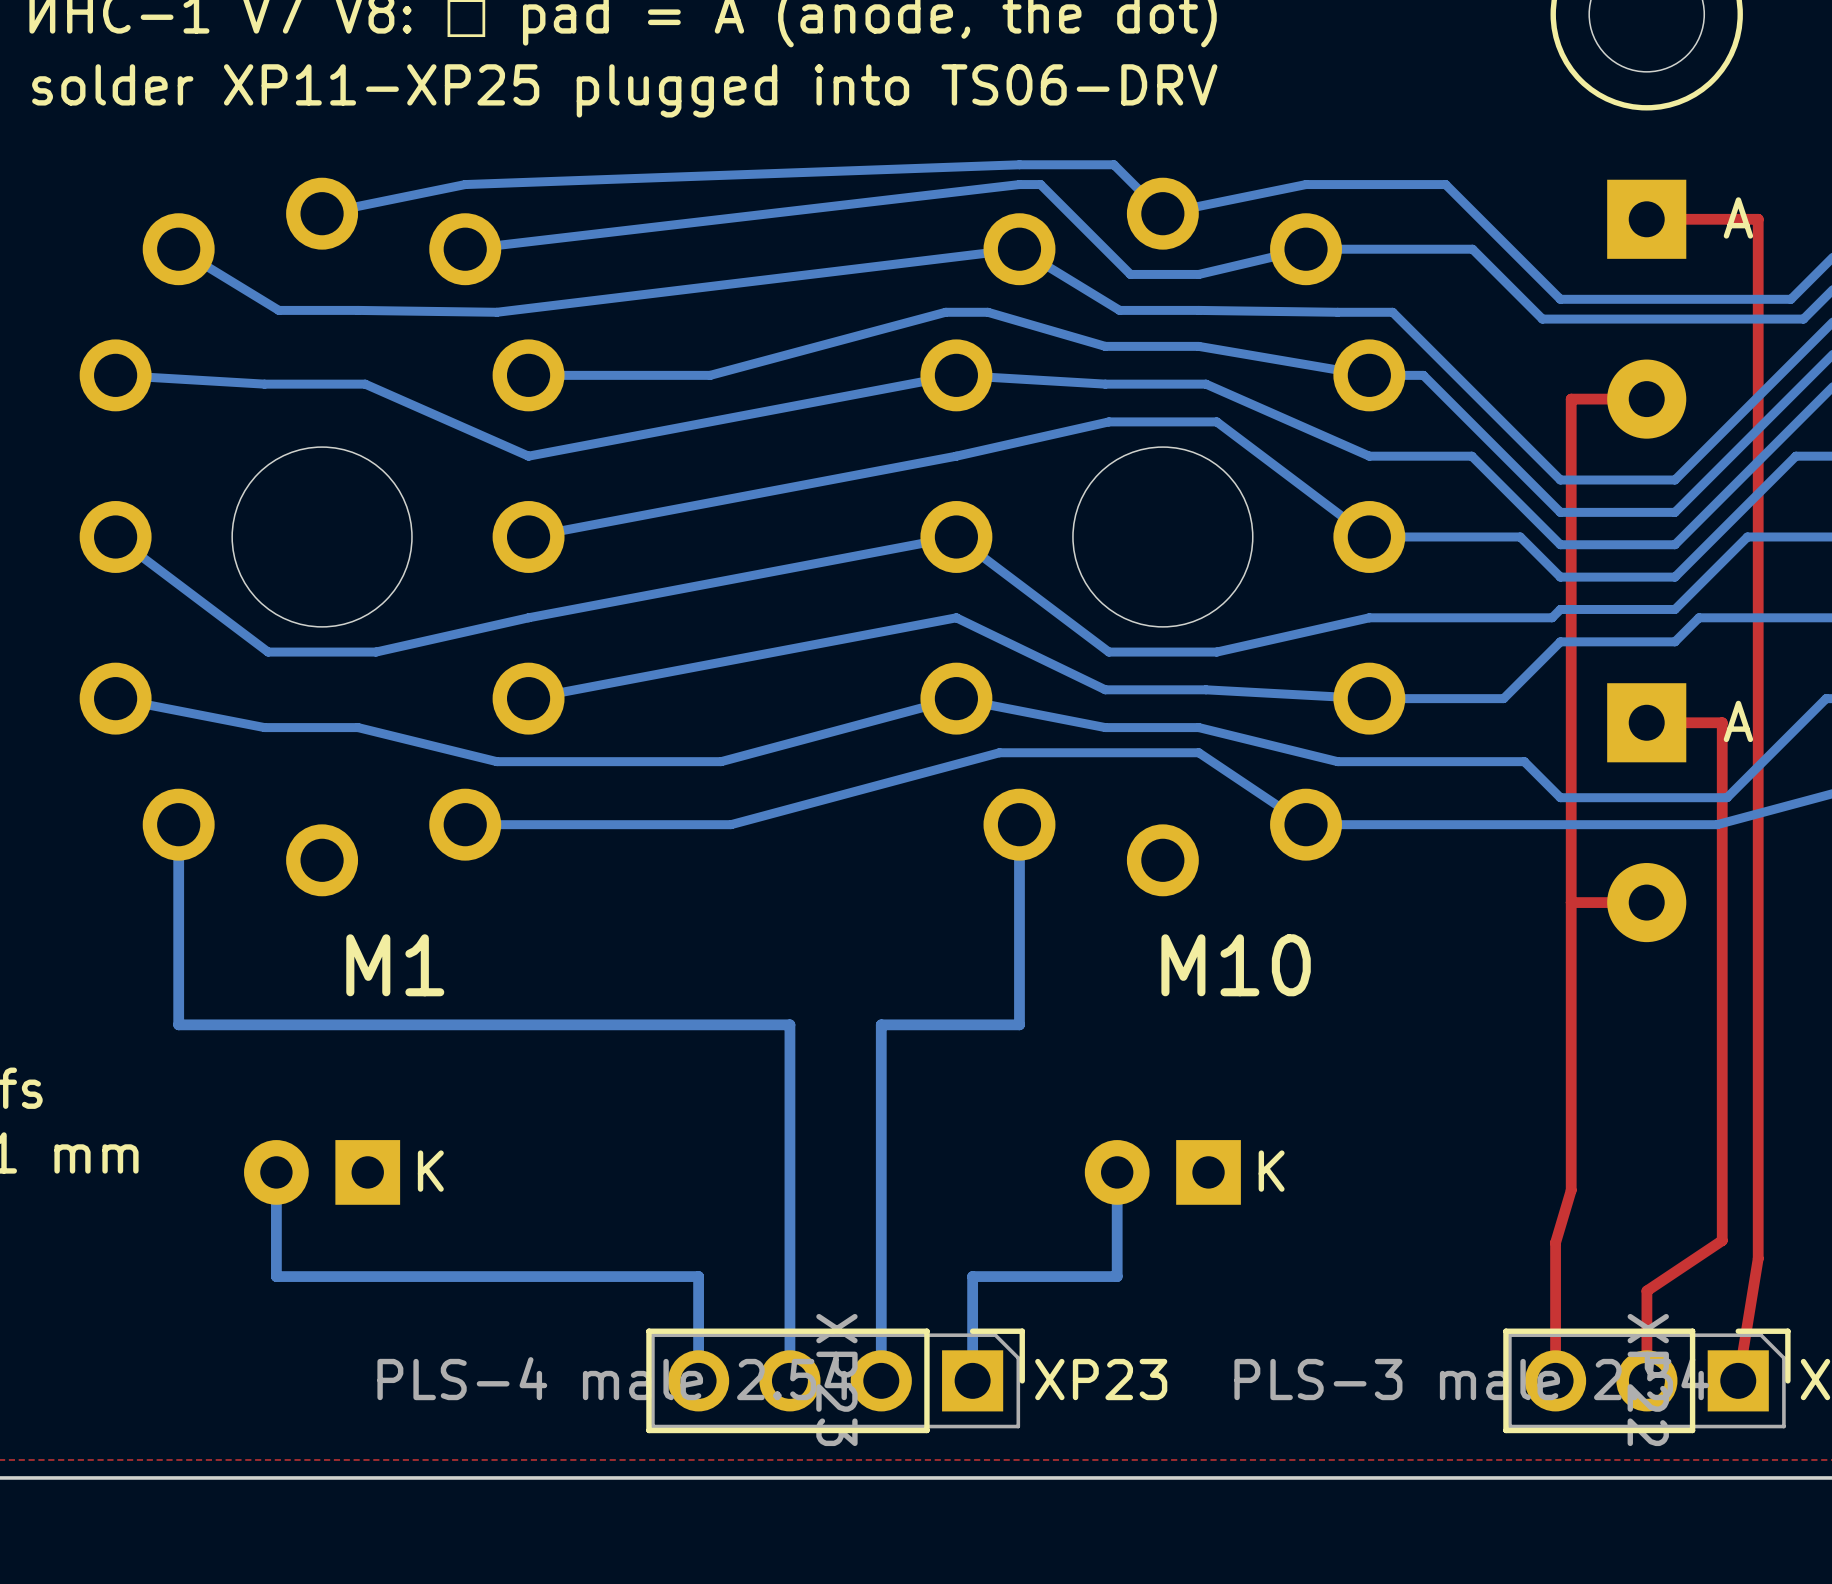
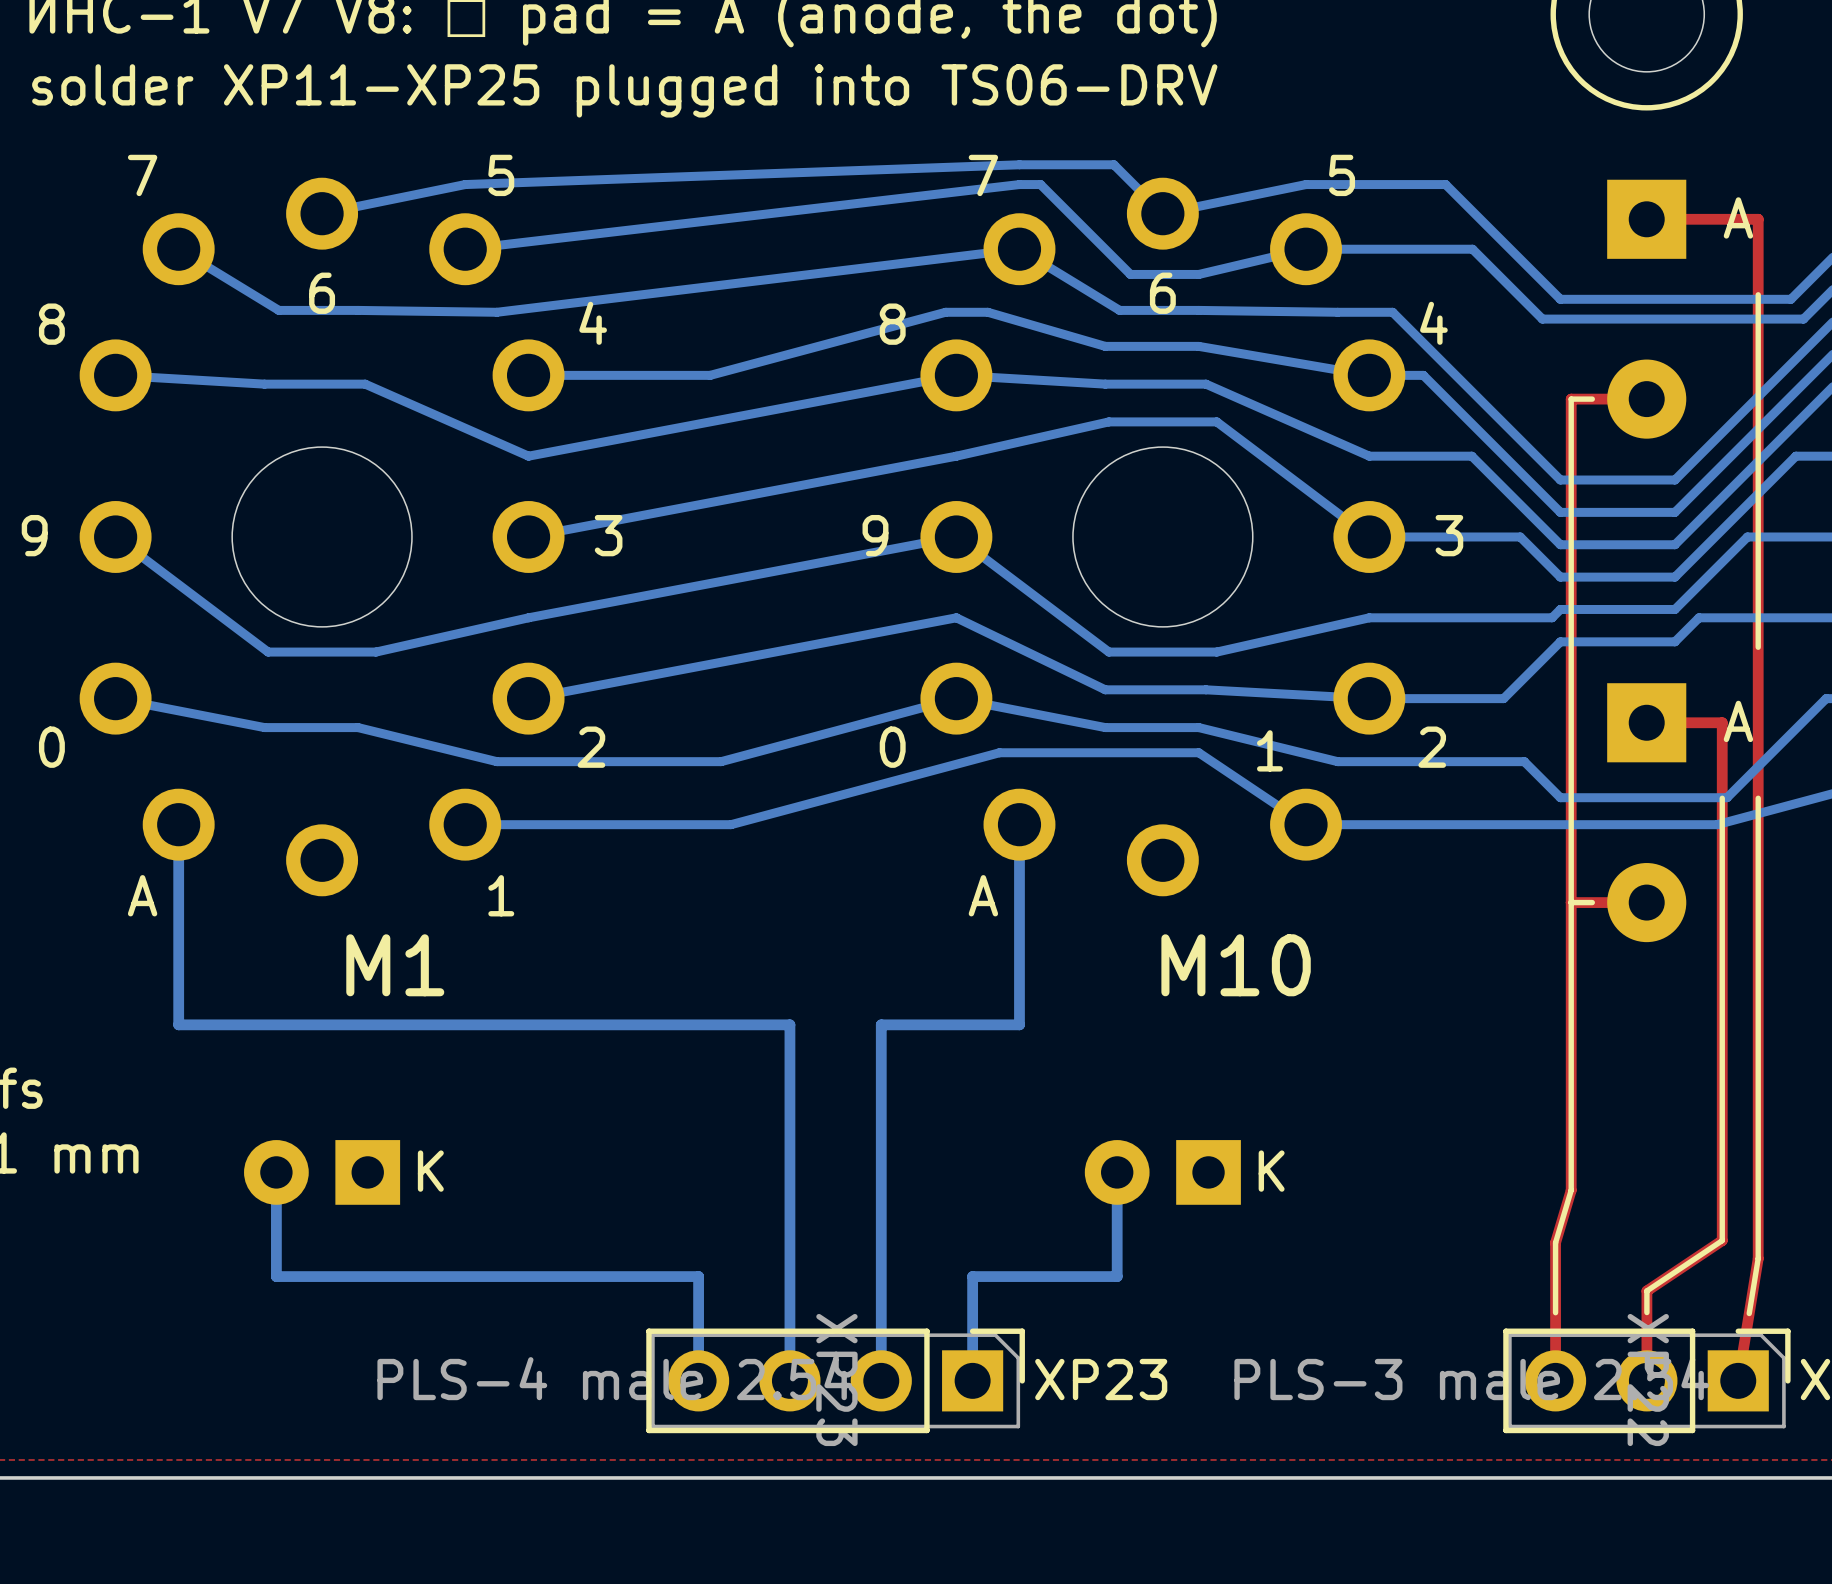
text: none -> 7 (142, 175)
text: none -> 5 (501, 175)
text: none -> 7 (983, 175)
text: none -> 5 (1342, 175)
text: none -> 6 (322, 293)
text: none -> 6 (1162, 293)
line: none -> (1758, 294) (1758, 647)
text: none -> 4 (593, 323)
text: none -> 4 (1433, 323)
text: none -> 8 (51, 324)
text: none -> 8 (892, 324)
line: none -> (1592, 399) (1571, 399) (1571, 1190) (1555, 1242) (1555, 1312)
text: none -> 9 (34, 535)
text: none -> 3 (608, 535)
text: none -> 9 (875, 535)
text: none -> 3 (1449, 535)
text: none -> 0 (51, 747)
text: none -> 2 (591, 747)
text: none -> 0 (892, 747)
text: none -> 2 (1432, 747)
text: none -> 1 (1269, 750)
line: none -> (1722, 798) (1722, 1240) (1646, 1290) (1646, 1312)
line: none -> (1758, 798) (1758, 1258) (1749, 1313)
text: none -> A (142, 895)
text: none -> 1 (501, 895)
text: none -> A (983, 895)
line: none -> (1592, 902) (1571, 902)

